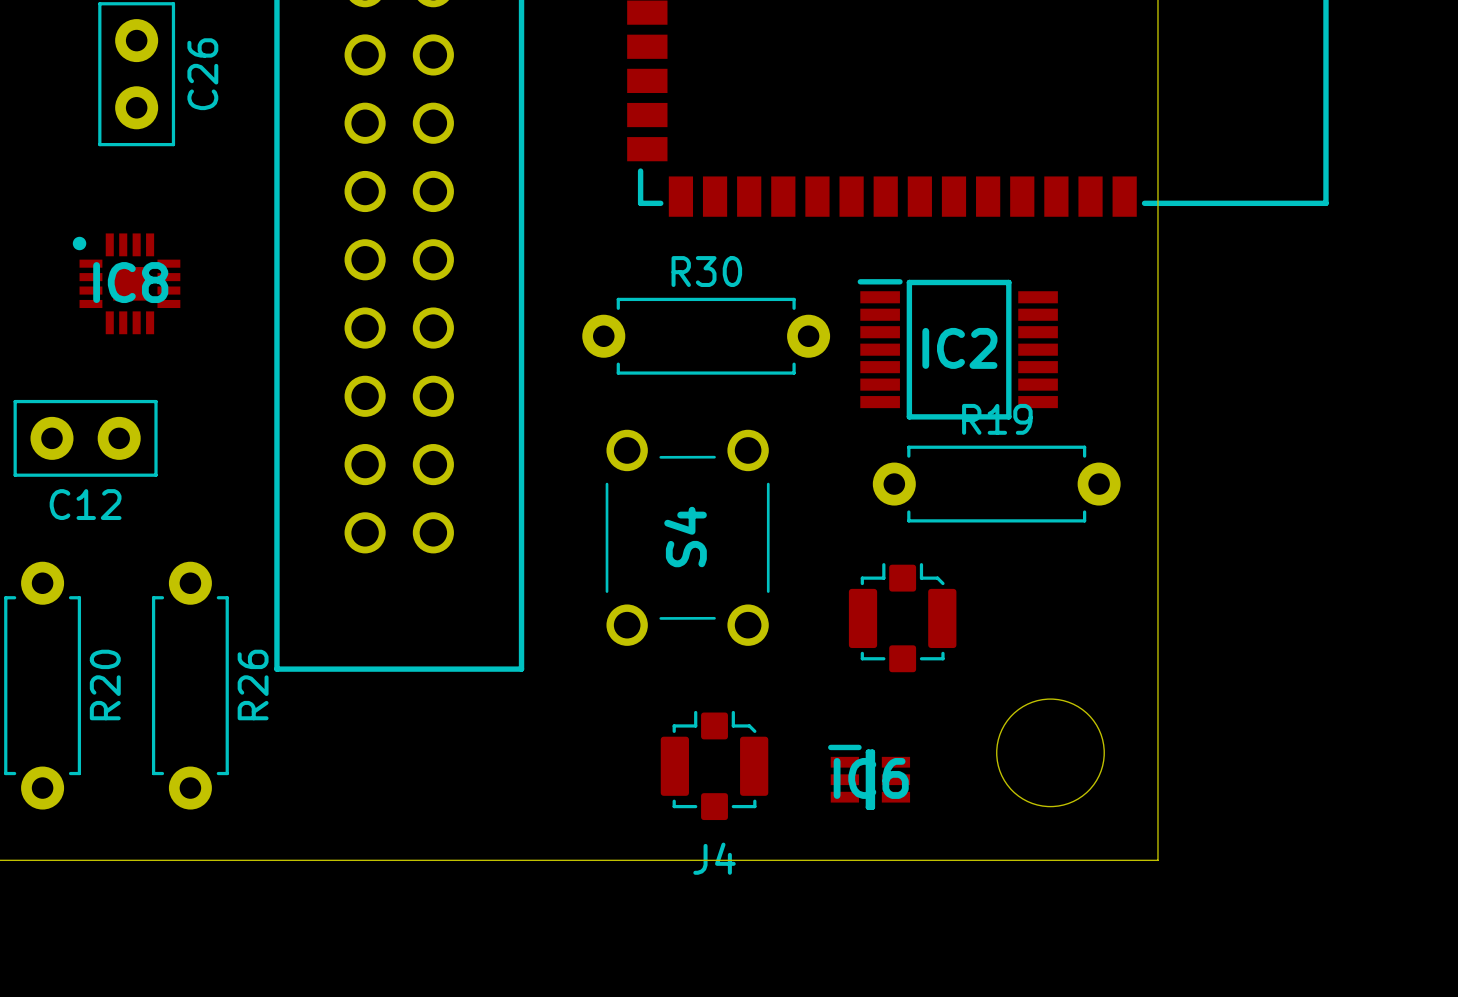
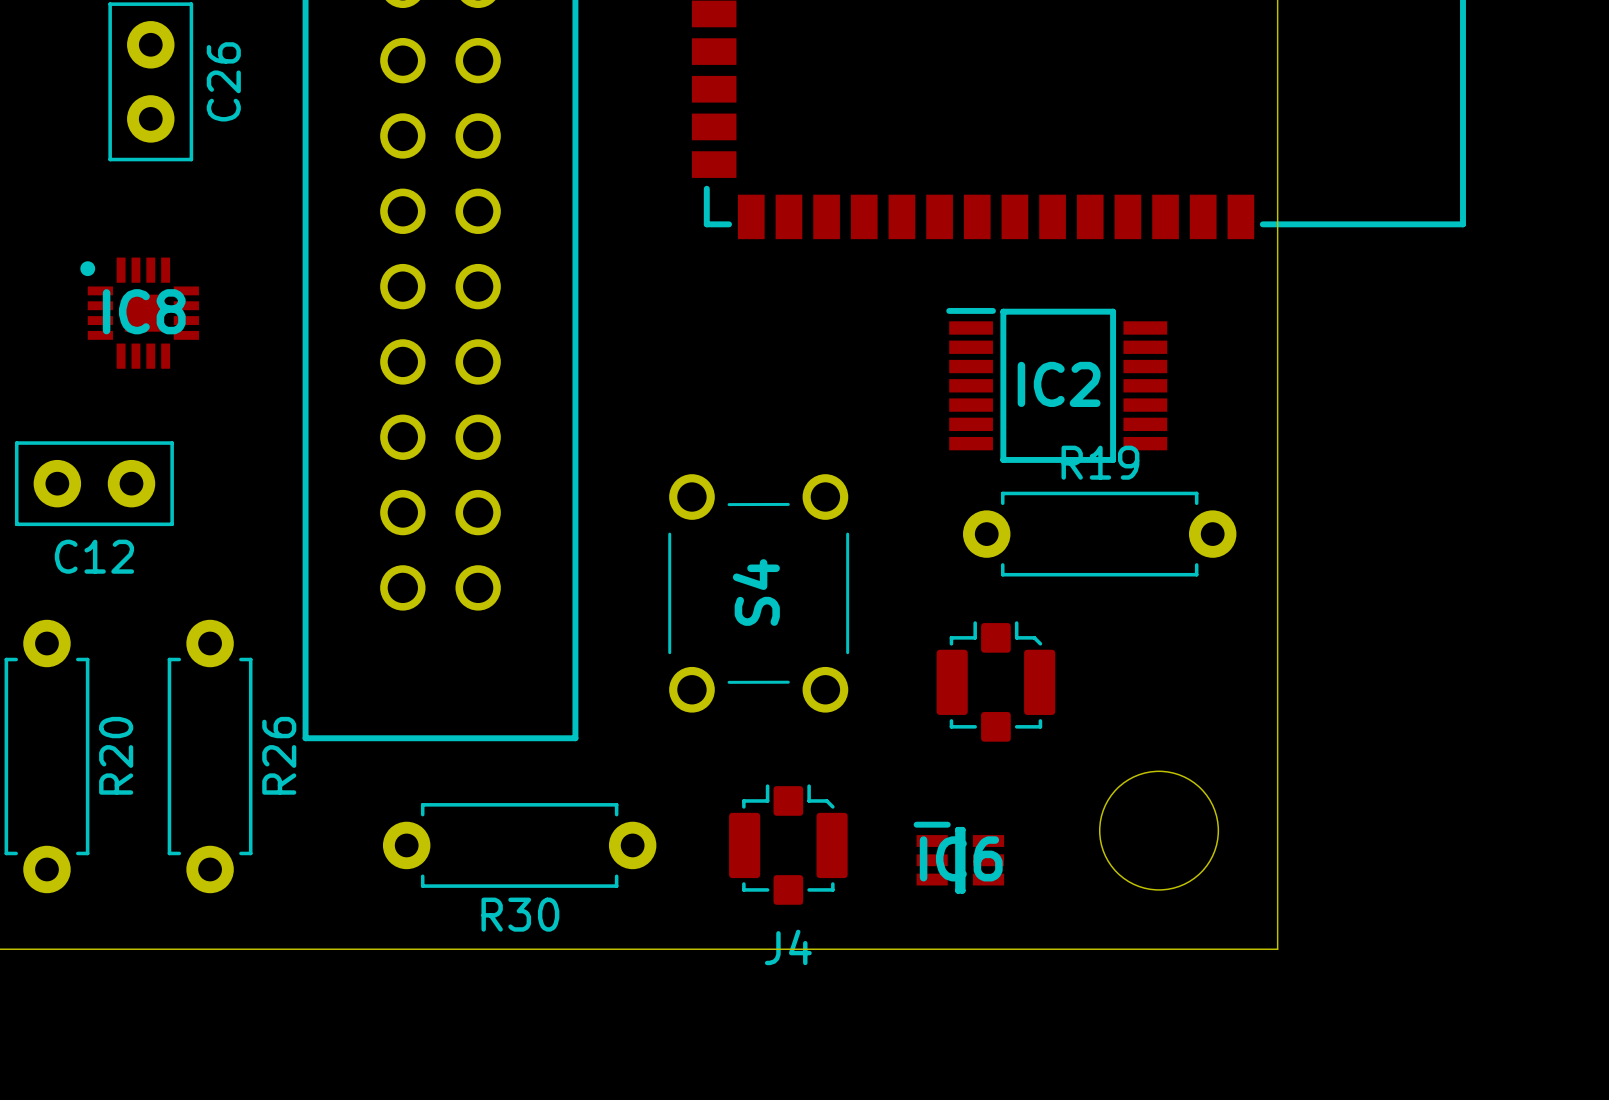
R30 name position: R30 (706, 271) -> R30 (520, 914)
R30 position: (706, 336) -> (519, 845)

